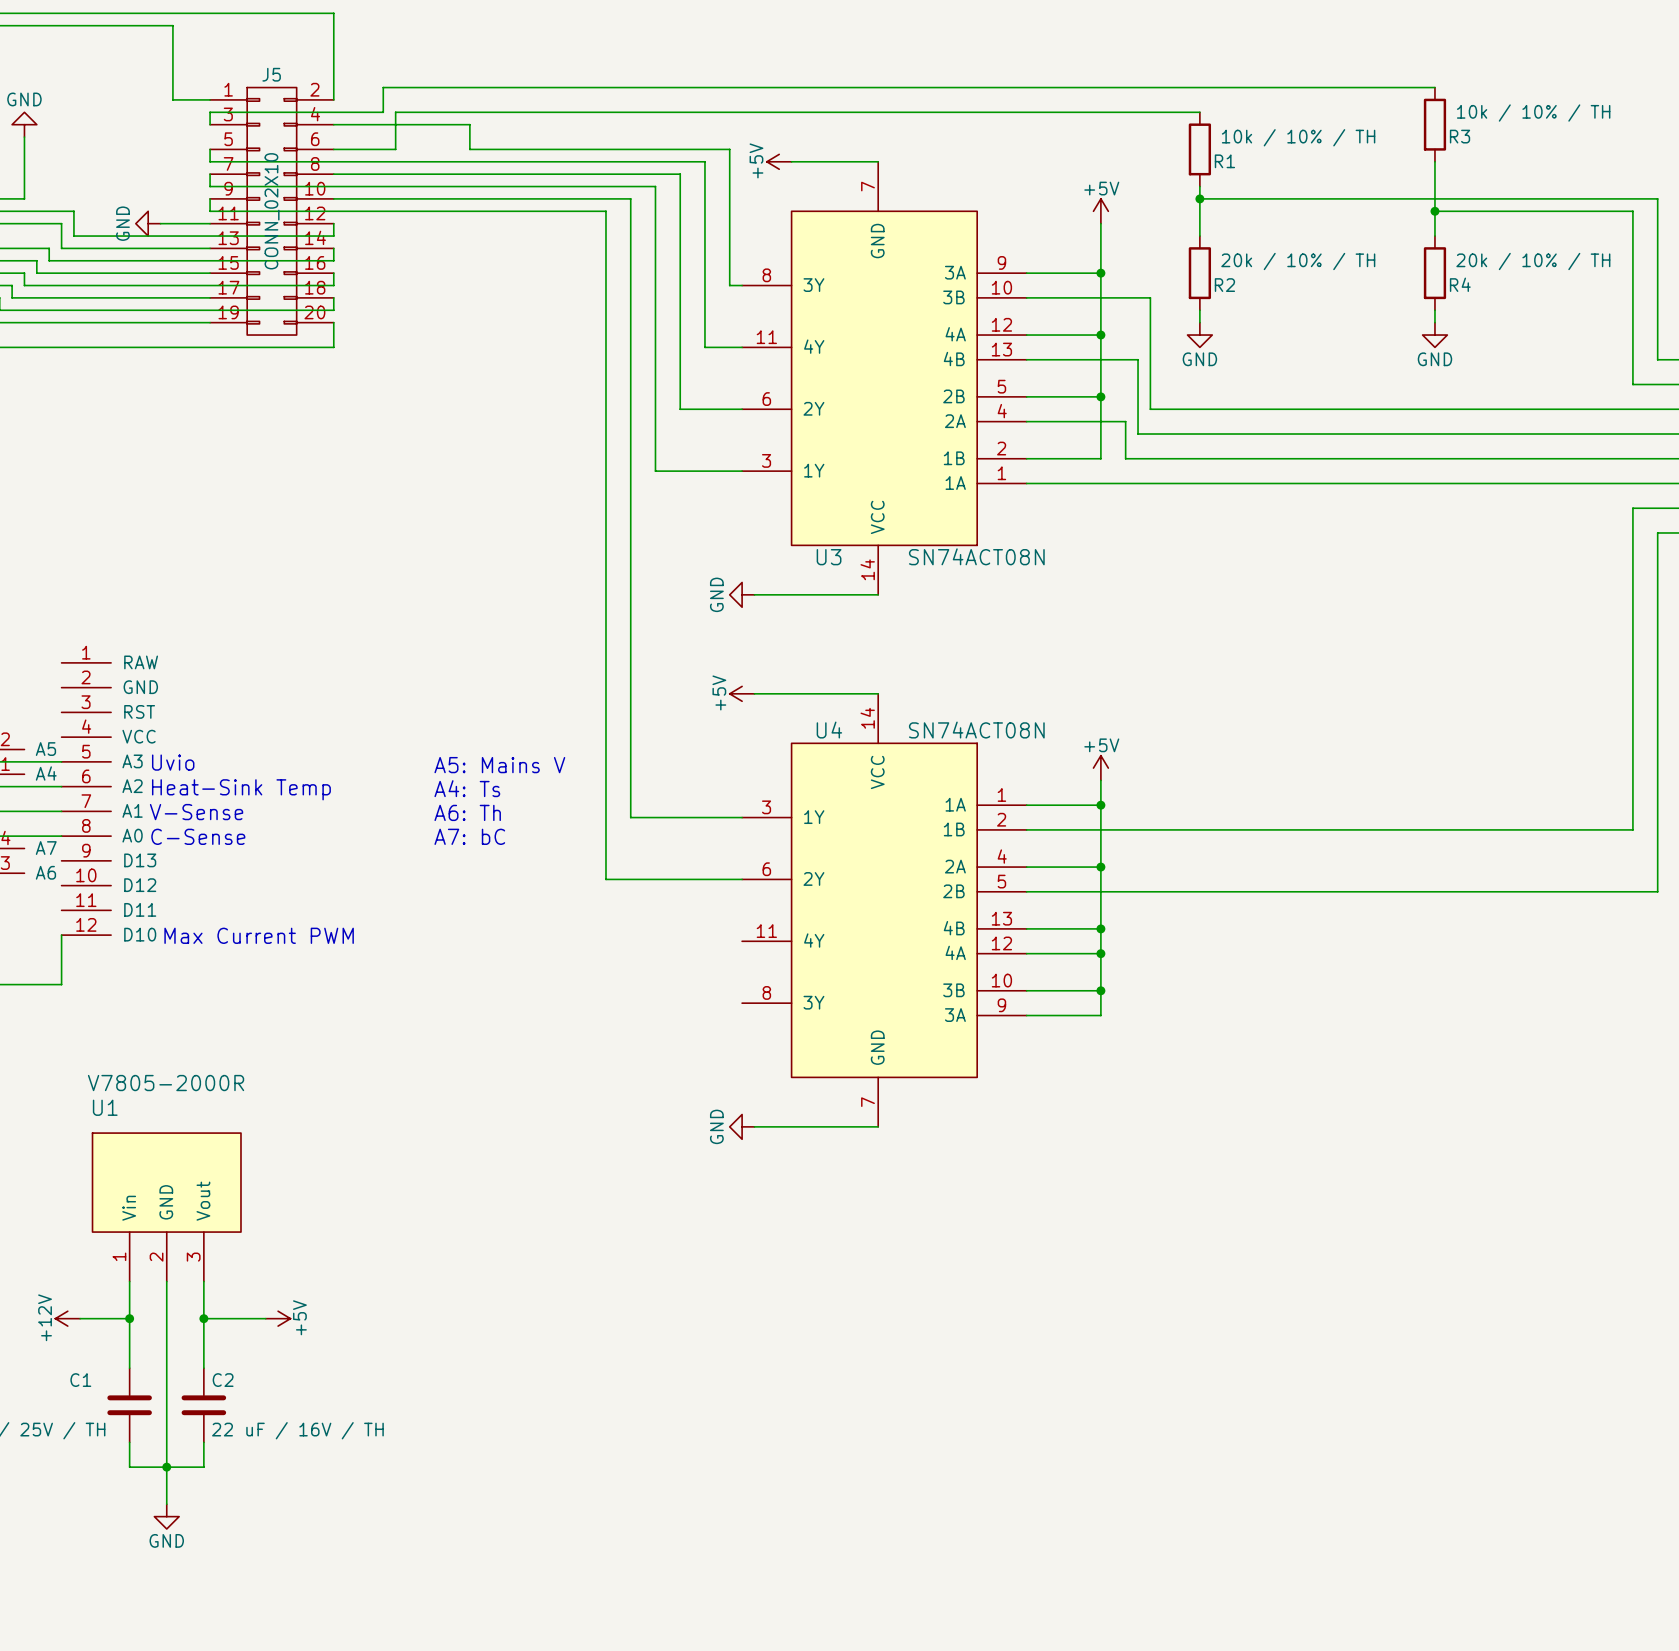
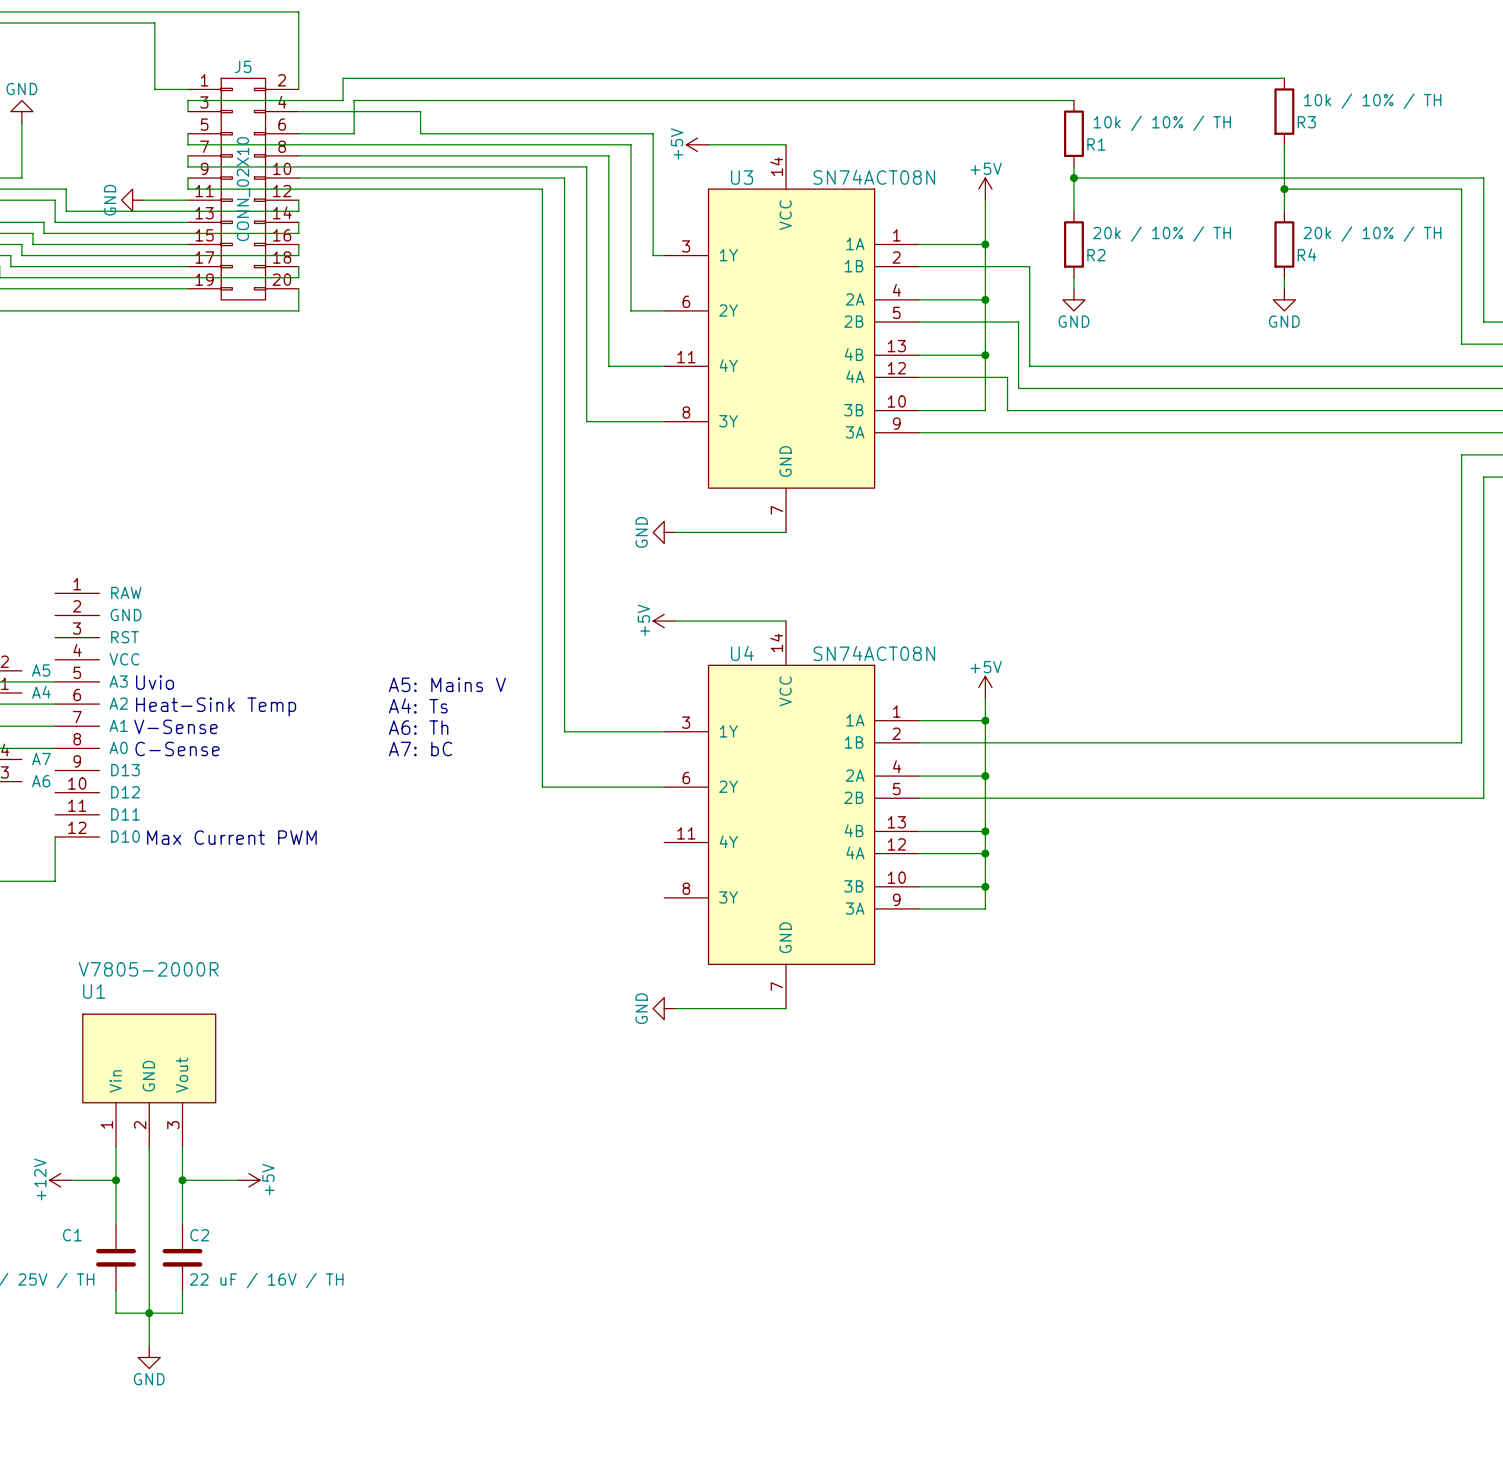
U3 flip: as is (884, 378) -> up-down (791, 338)

